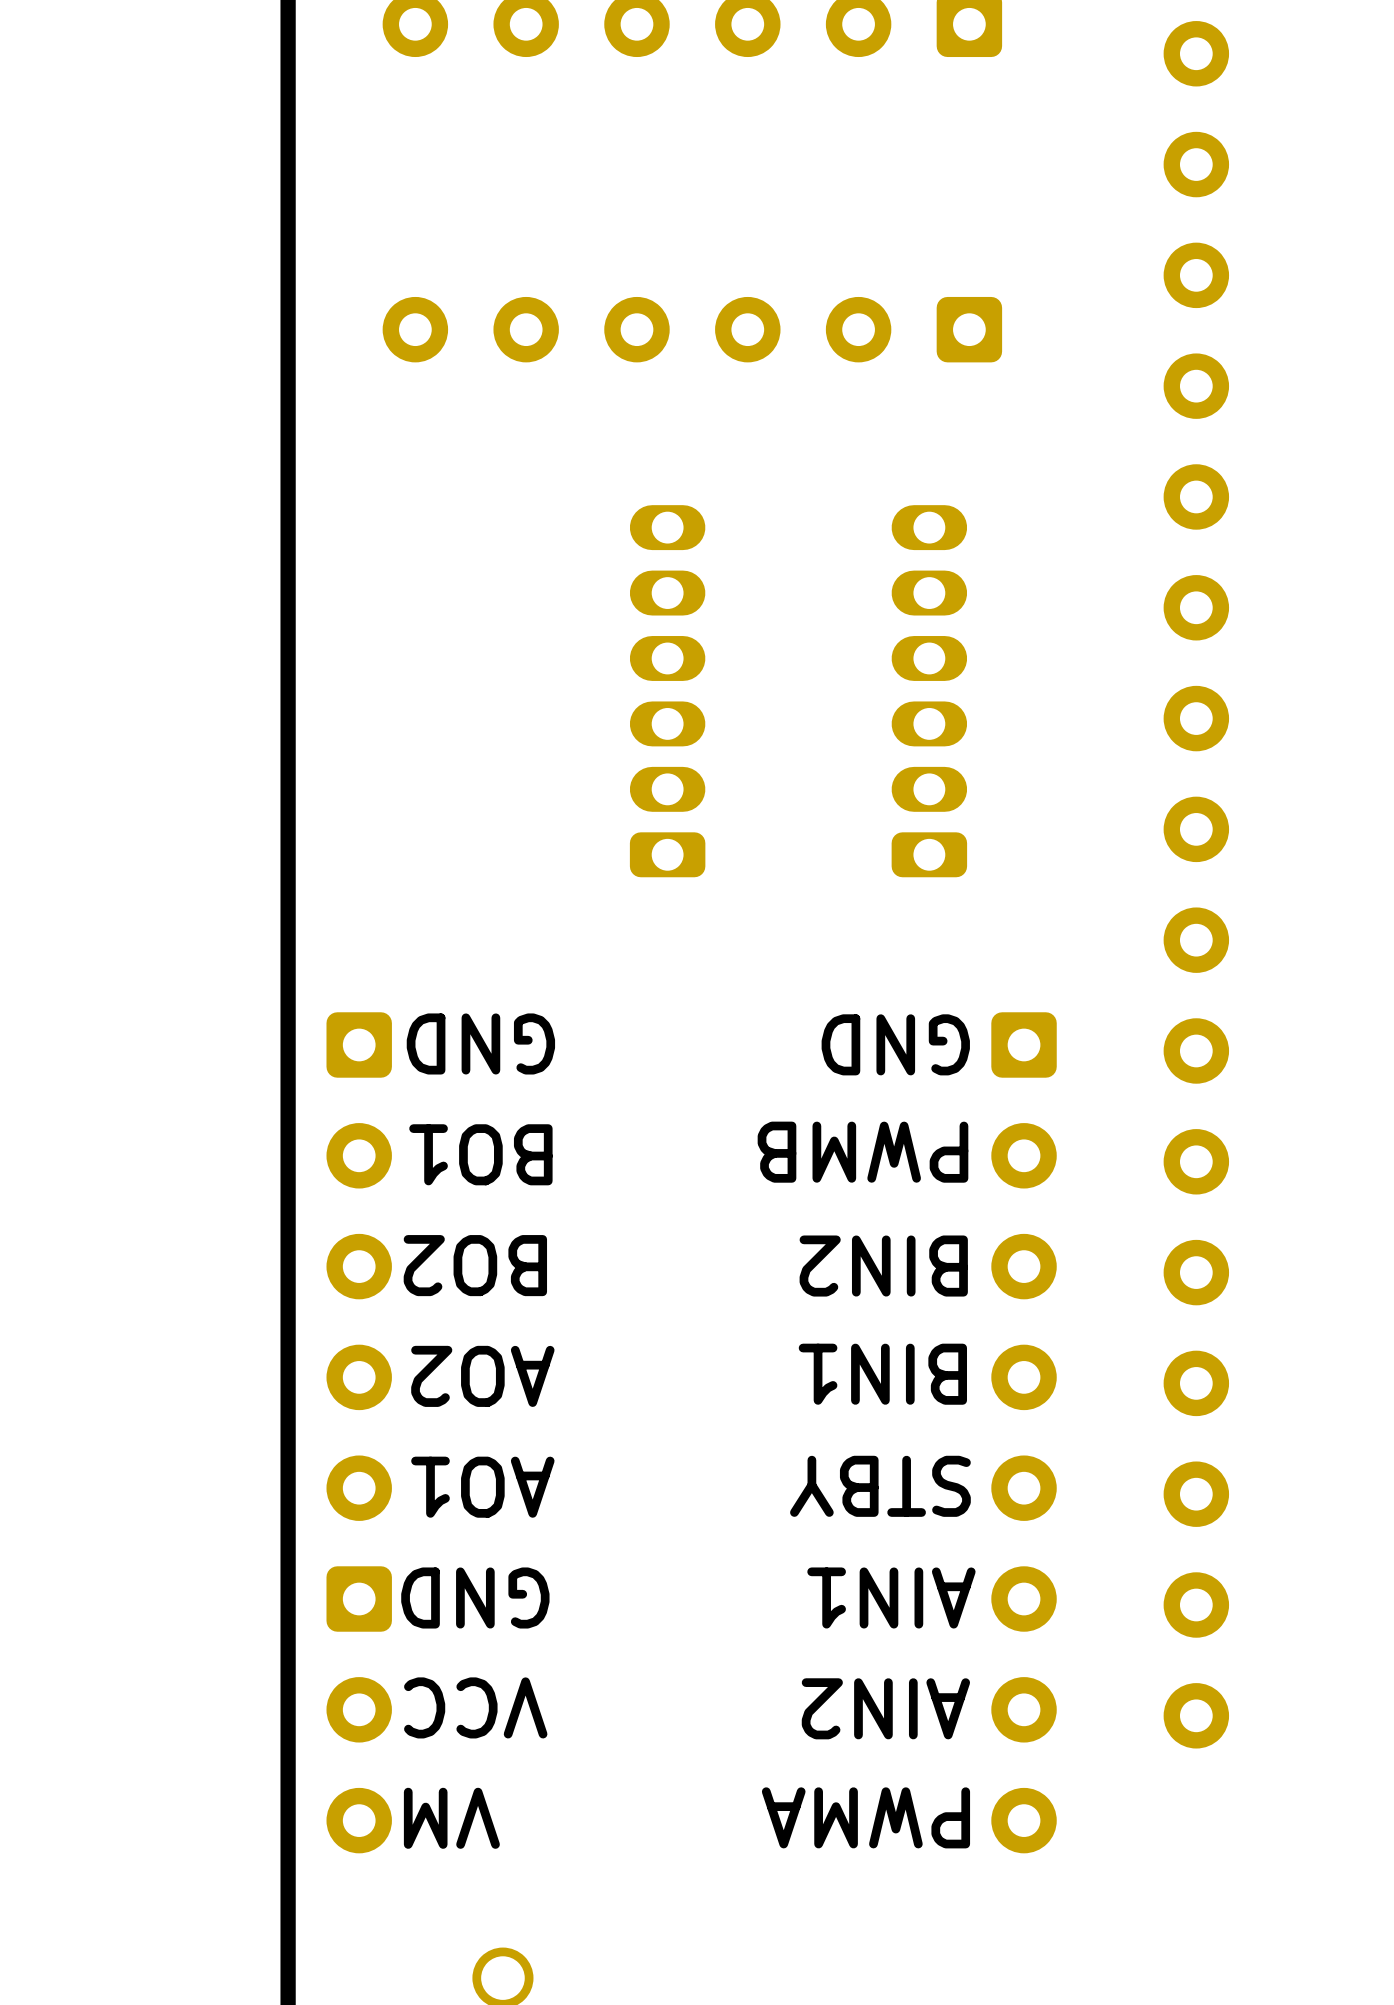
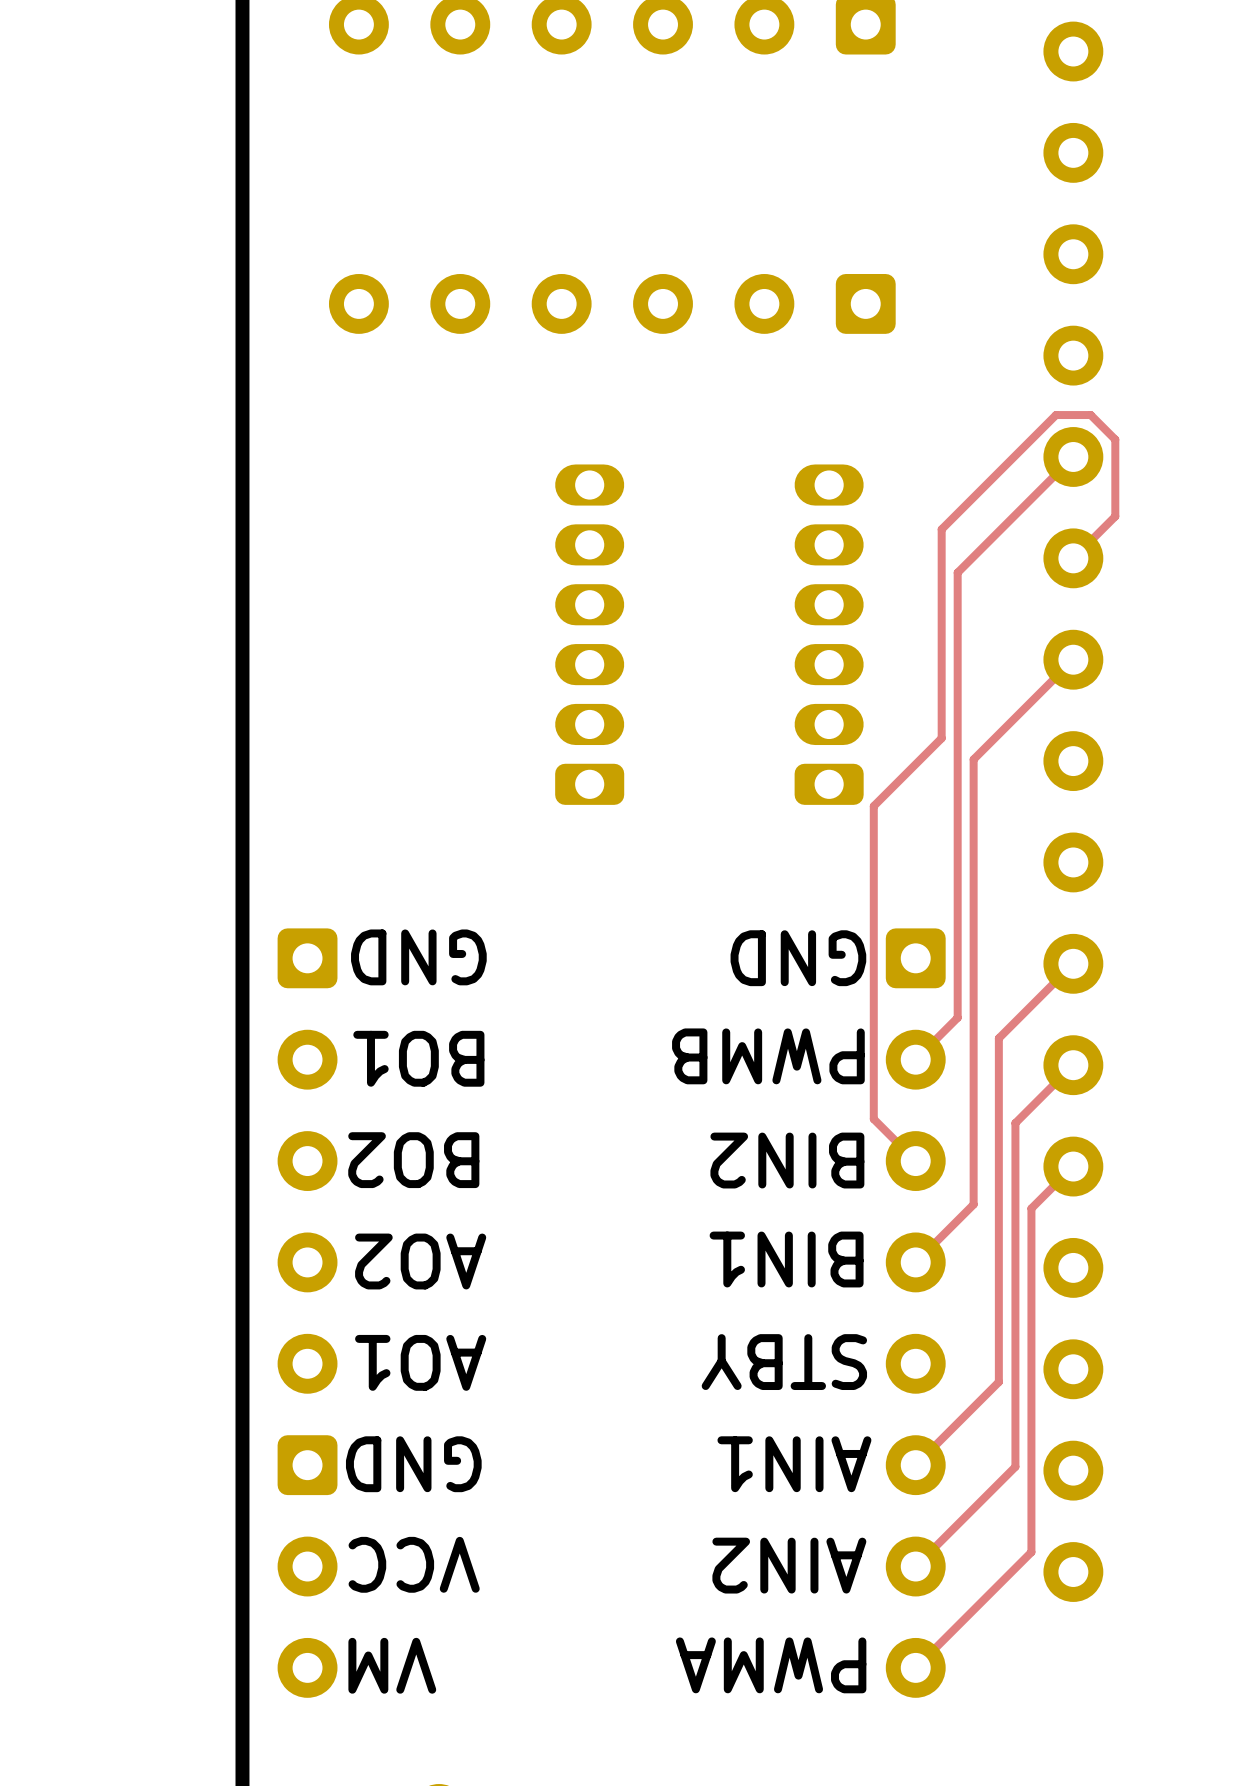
top track: none -> (1073, 456) (957, 572) (957, 1017) (915, 1059)
top track: none -> (1073, 558) (1115, 516) (1115, 439) (1090, 415) (1056, 415) (941, 529) (941, 738) (873, 806) (873, 1119) (915, 1161)
top track: none -> (1073, 659) (973, 759) (973, 1204) (915, 1262)
top track: none -> (1073, 963) (998, 1038) (998, 1382) (915, 1465)
top track: none -> (1073, 1065) (1015, 1123) (1015, 1466) (915, 1566)
top track: none -> (1073, 1166) (1031, 1208) (1031, 1552) (915, 1667)

